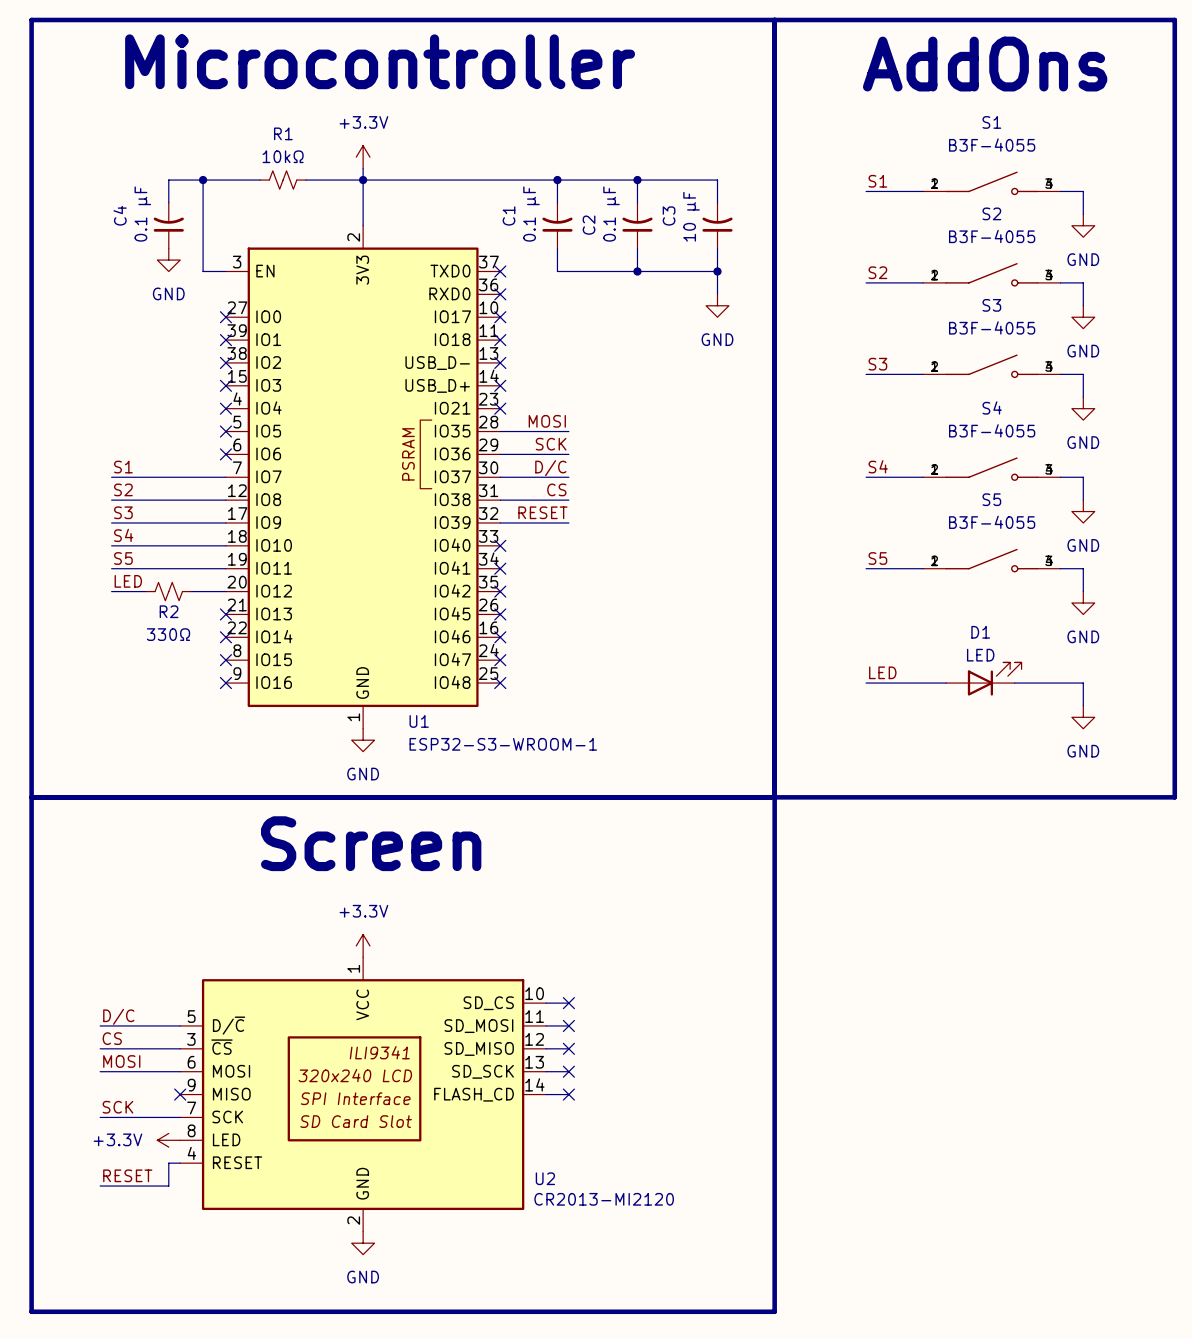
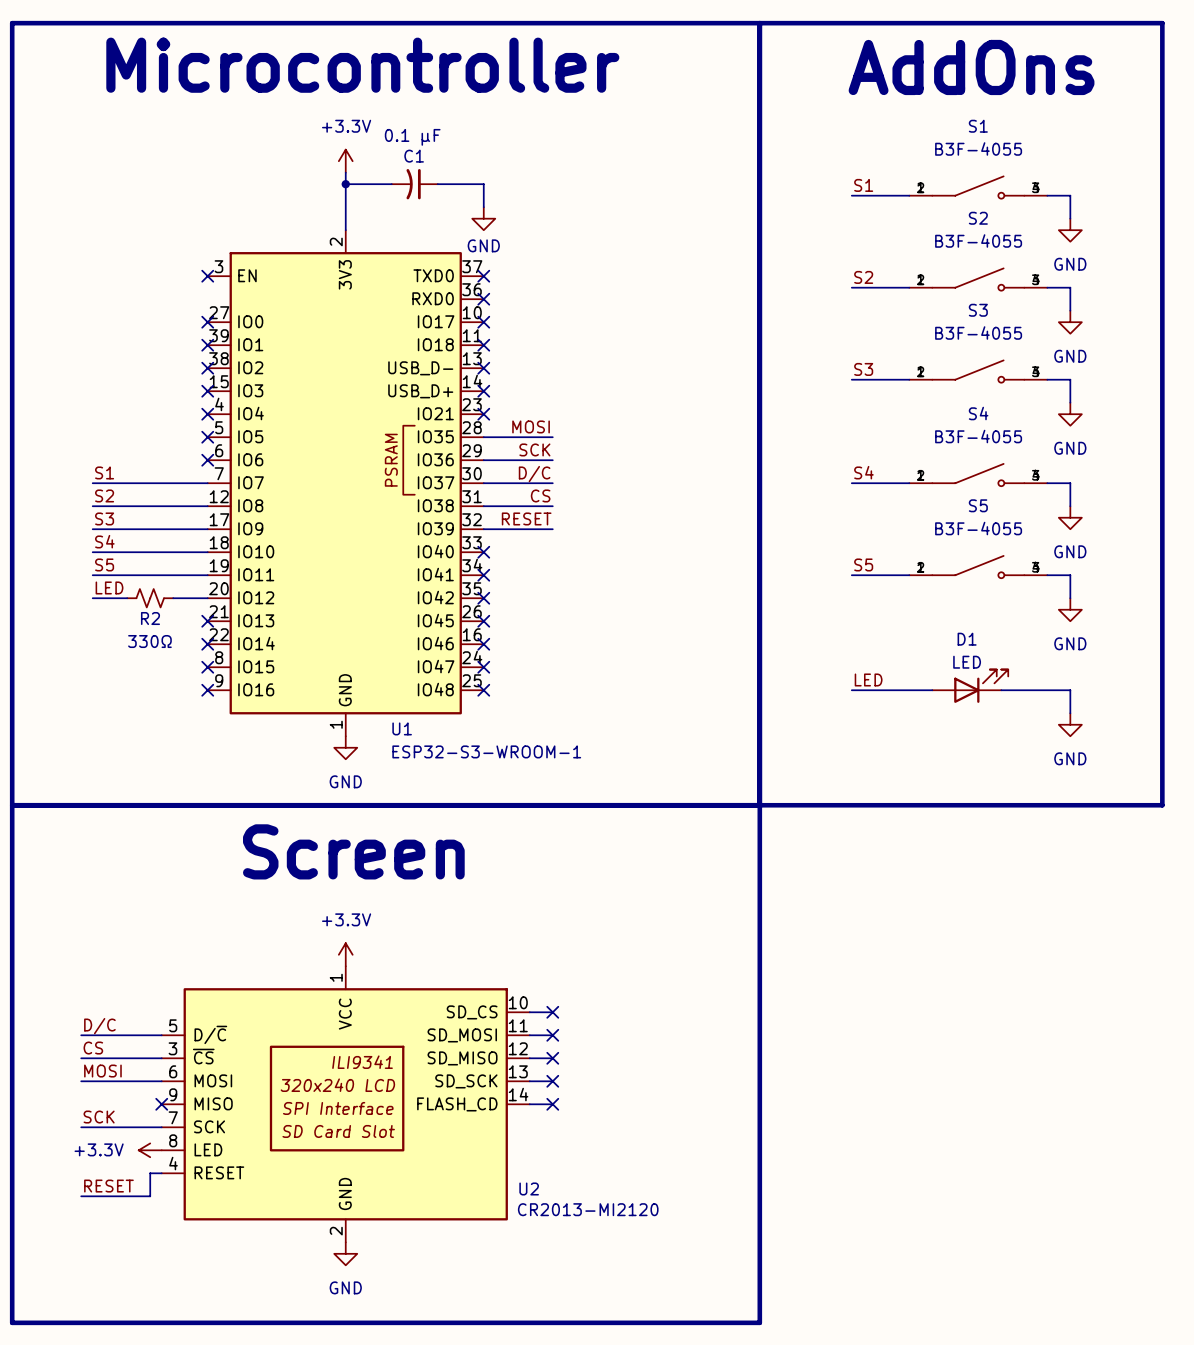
wire: (203, 180) (203, 271) (225, 271) -> none
junction: (203, 180) -> none
wire: (260, 180) (168, 180) (168, 202) -> none
R1: 10kΩ (283, 180) -> none
wire: (305, 180) (363, 180) -> none
wire: (500, 180) (717, 180) (717, 202) -> (483, 184) (483, 207)
wire: (557, 180) (557, 202) -> none
junction: (557, 180) -> none
wire: (637, 180) (637, 202) -> none
junction: (637, 180) -> none
power symbol: none -> GND (483, 218)
C1 value position: 0.1 μF (531, 214) -> 0.1 μF (412, 137)
C1 name position: C1 (509, 215) -> C1 (414, 156)
C1 rotation: 0° (557, 224) -> 90° counterclockwise (413, 184)
C4: 0.1 μF (168, 225) -> none
C1 position: (557, 225) -> (414, 184)
C2: 0.1 μF (637, 225) -> none
C3: 10 μF (717, 225) -> none
wire: (557, 248) (557, 271) (717, 271) -> none
wire: (637, 248) (637, 271) -> none
wire: (717, 248) (717, 294) -> none
power symbol: GND (168, 260) -> none
no-connect mark: none -> (207, 276)
junction: (637, 271) -> none
junction: (717, 271) -> none
power symbol: GND (717, 305) -> none

